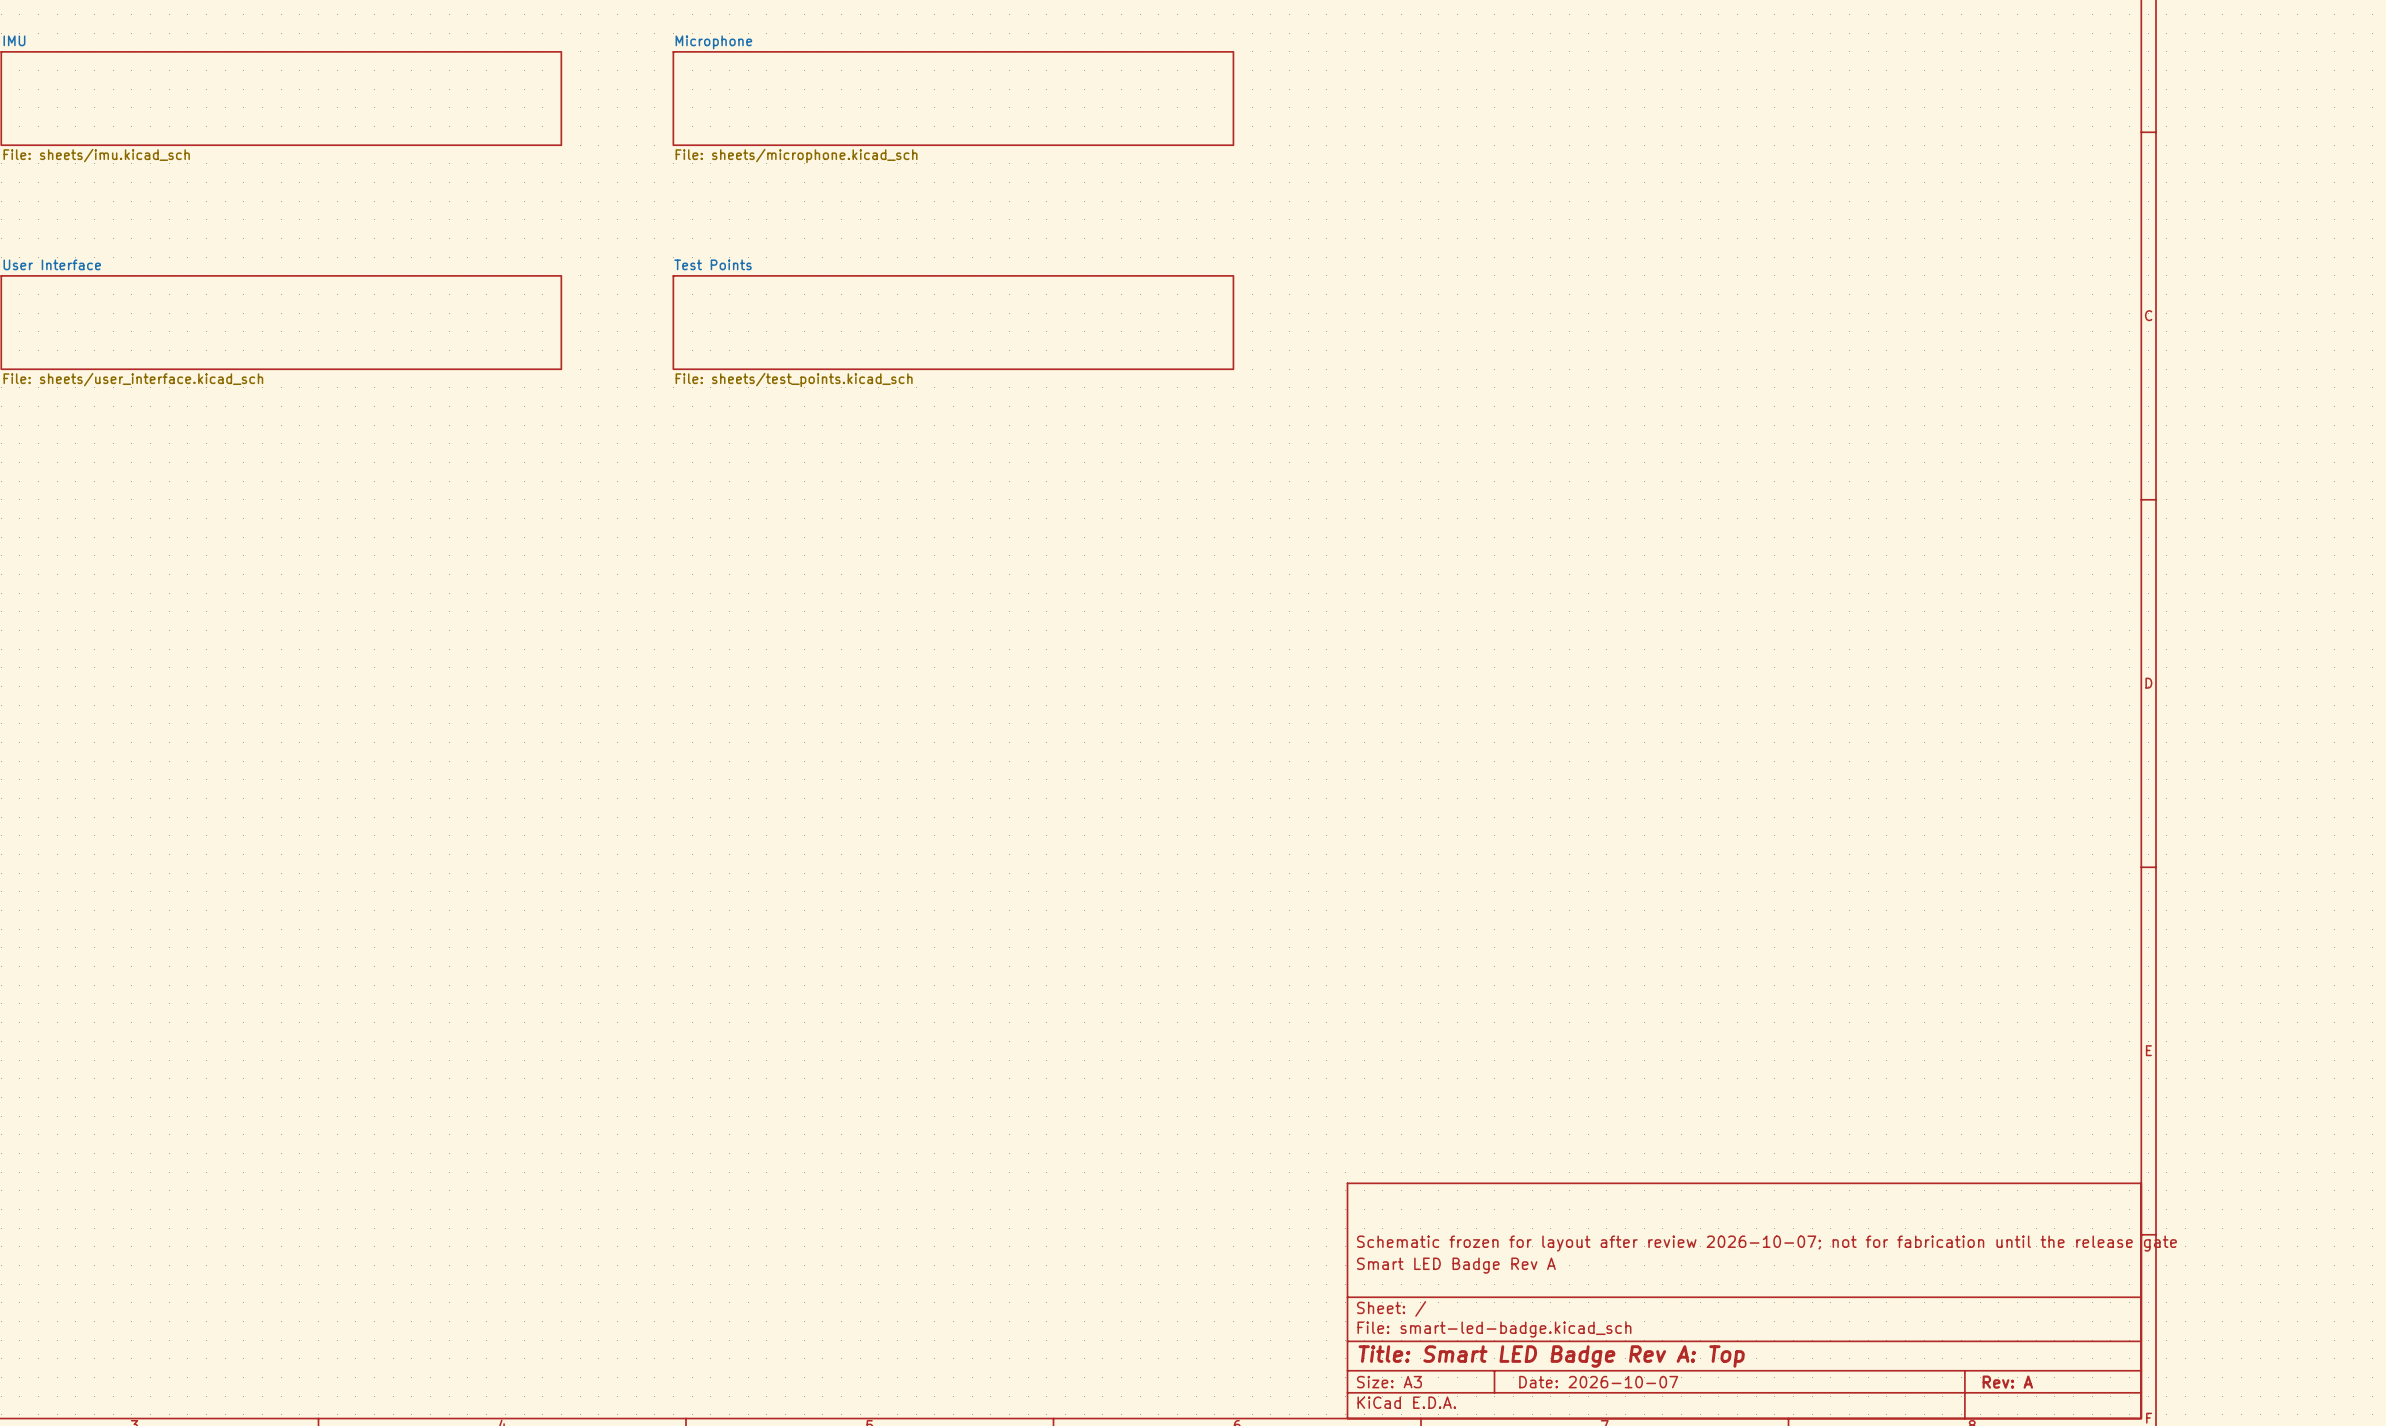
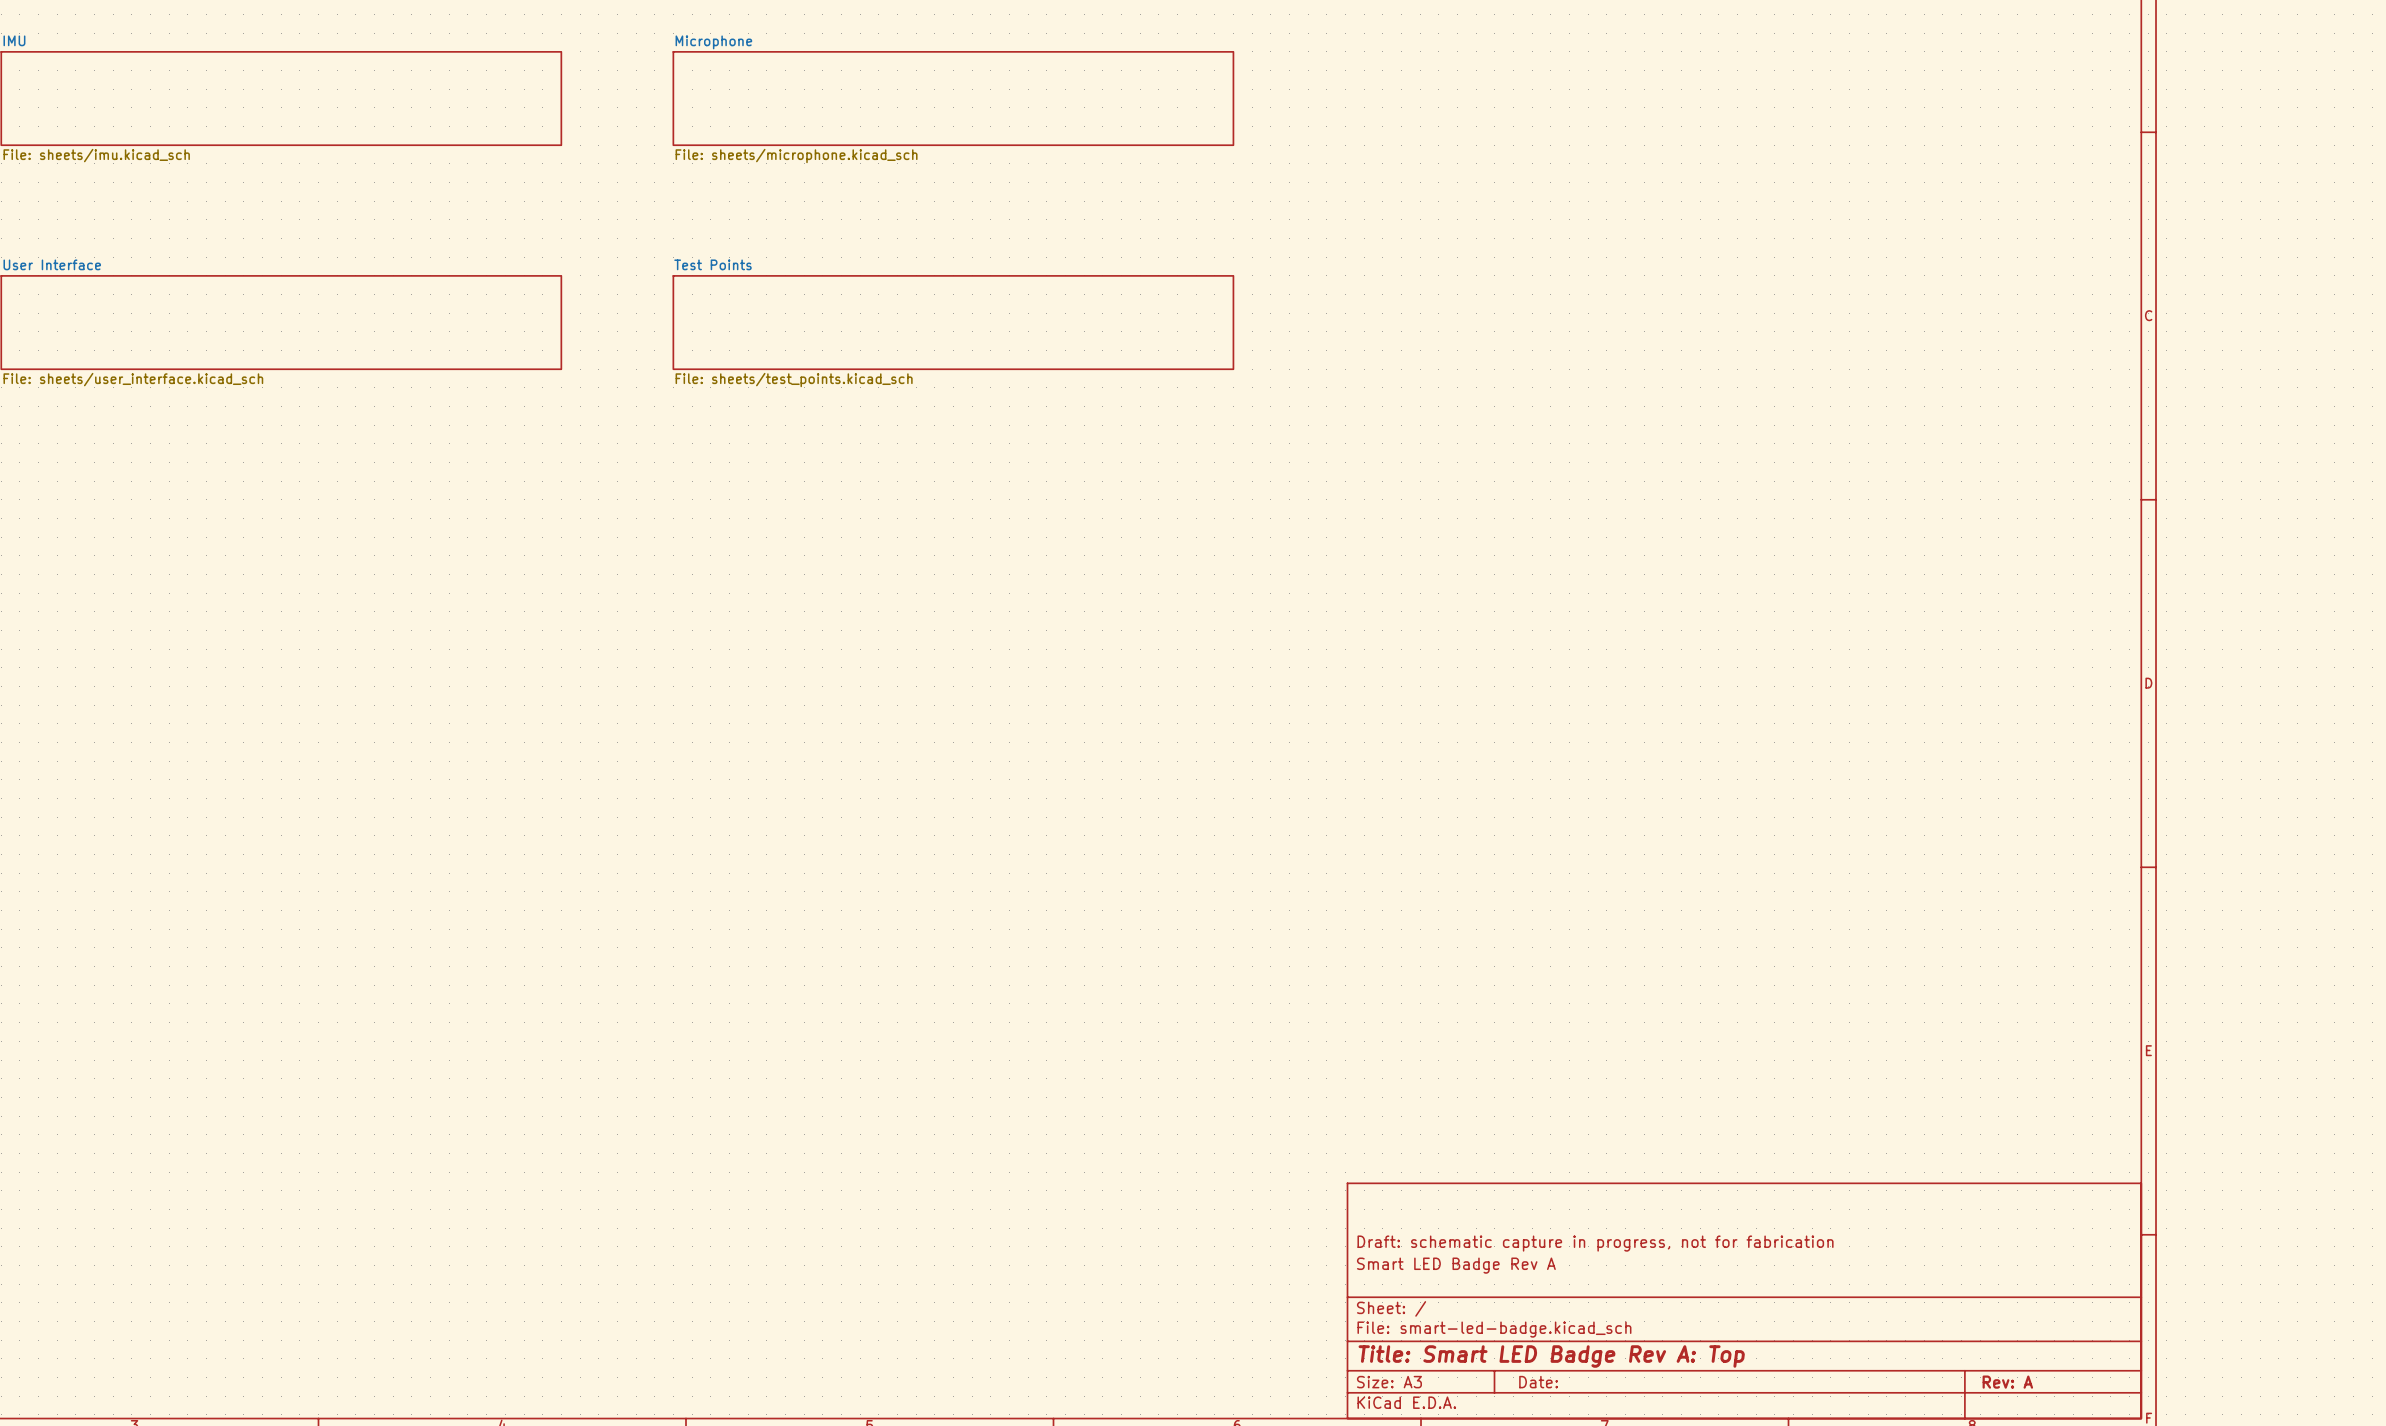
title block: Schematic frozen for layout after review 2026-10-07; not for fabrication until the release gate (1766, 1243) -> Draft: schematic capture in progress, not for fabrication (1595, 1243)
title block: Date: 2026-10-07 (1598, 1382) -> Date: (1538, 1382)

